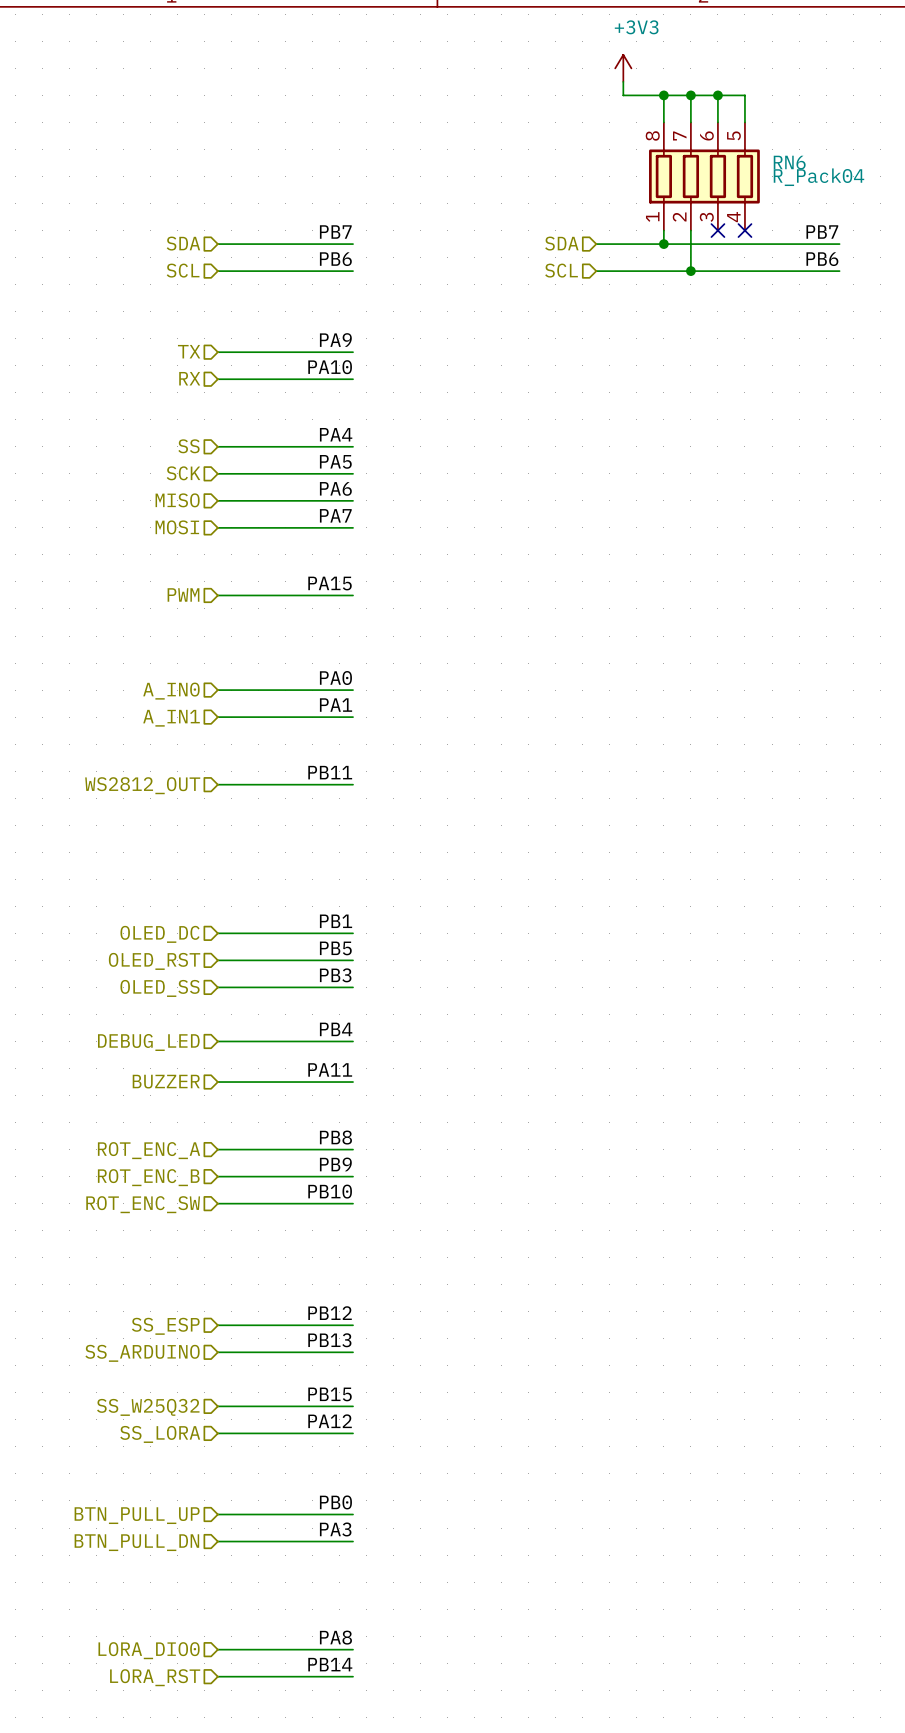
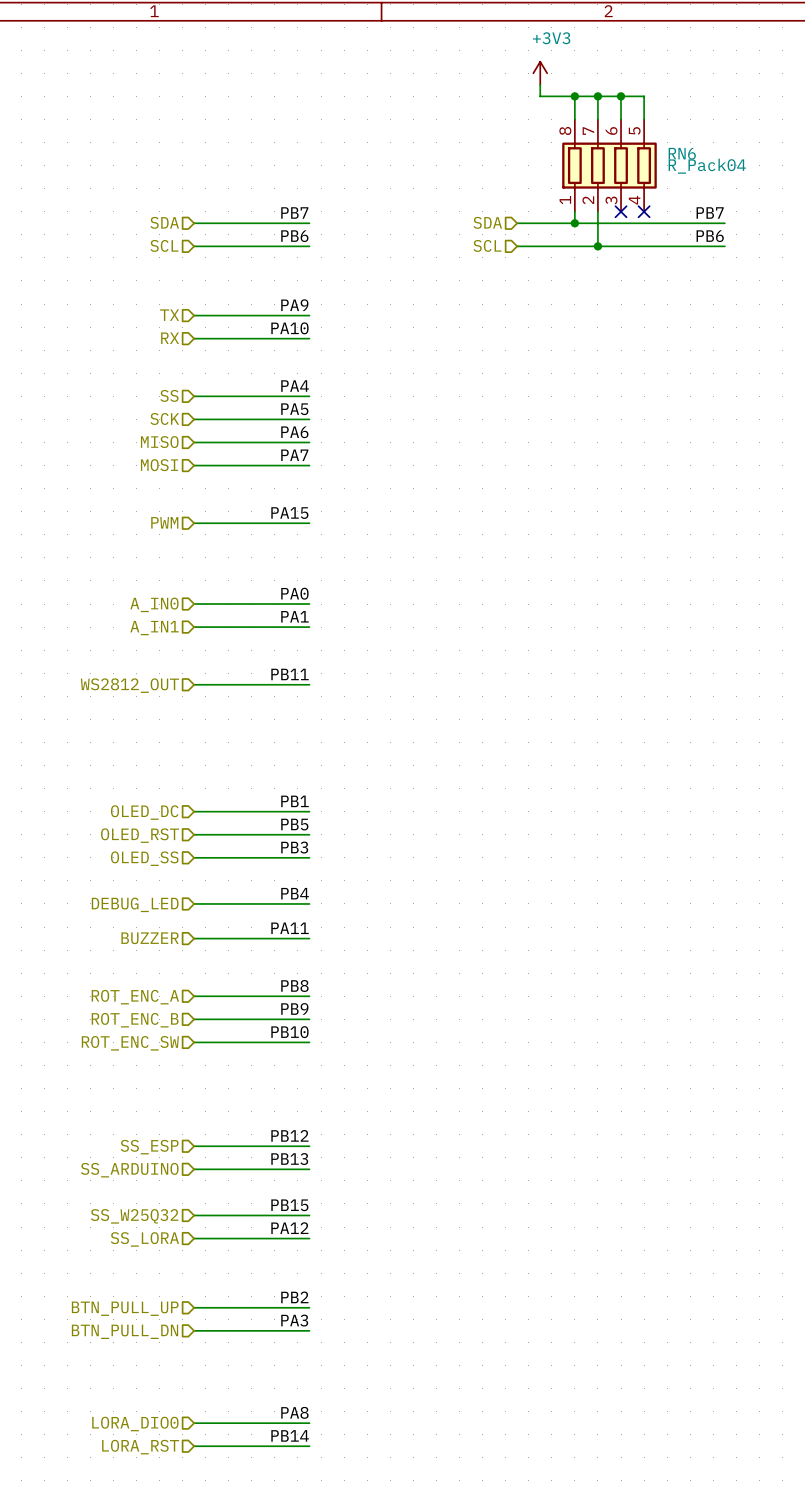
label: PB0 (335, 1502) -> PB2 (294, 1297)

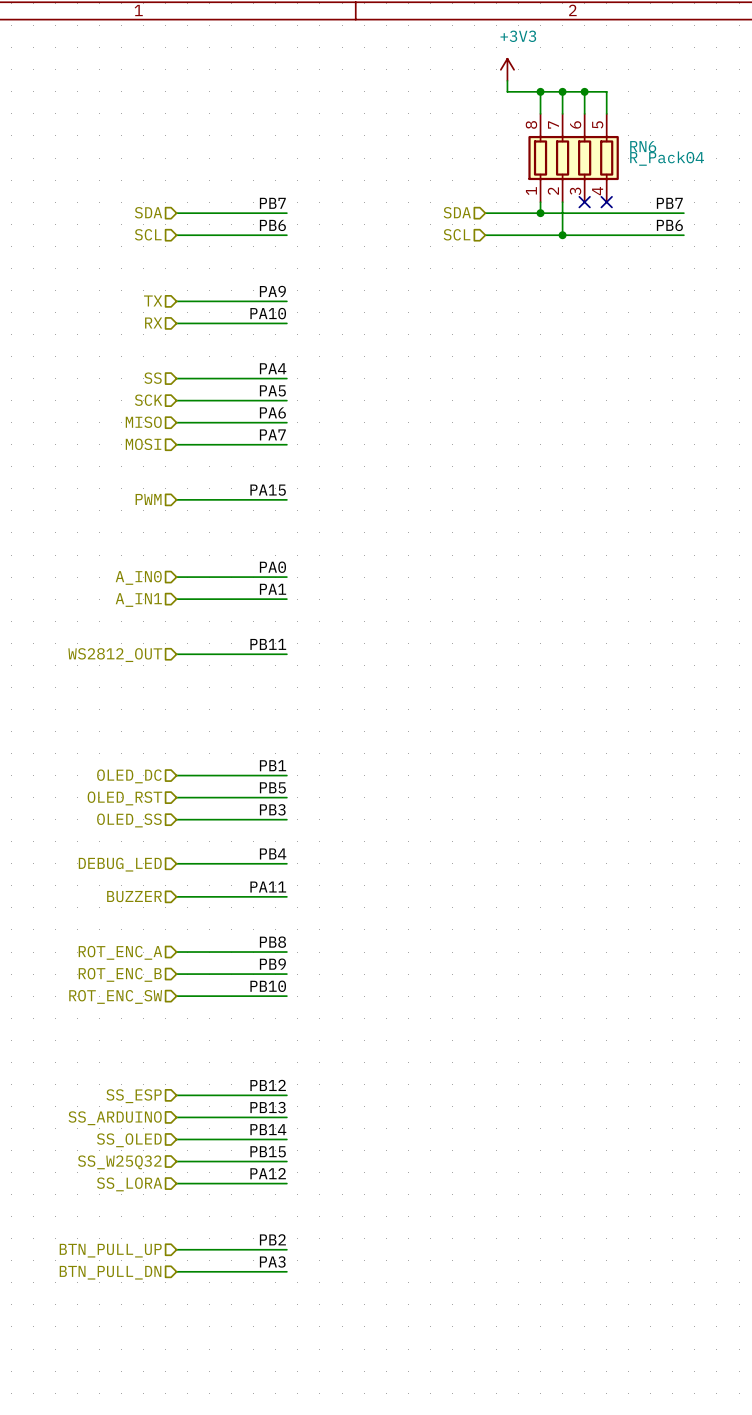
label: none -> PB14 (268, 1129)
wire: none -> (176, 1139) (286, 1139)
hierarchical label: none -> SS_OLED (129, 1140)
label: PA8 (294, 1412) -> none
wire: (194, 1423) (309, 1423) -> none
hierarchical label: LORA_DIO0 (135, 1424) -> none
label: PB14 (290, 1435) -> none
wire: (194, 1446) (309, 1446) -> none
hierarchical label: LORA_RST (140, 1447) -> none

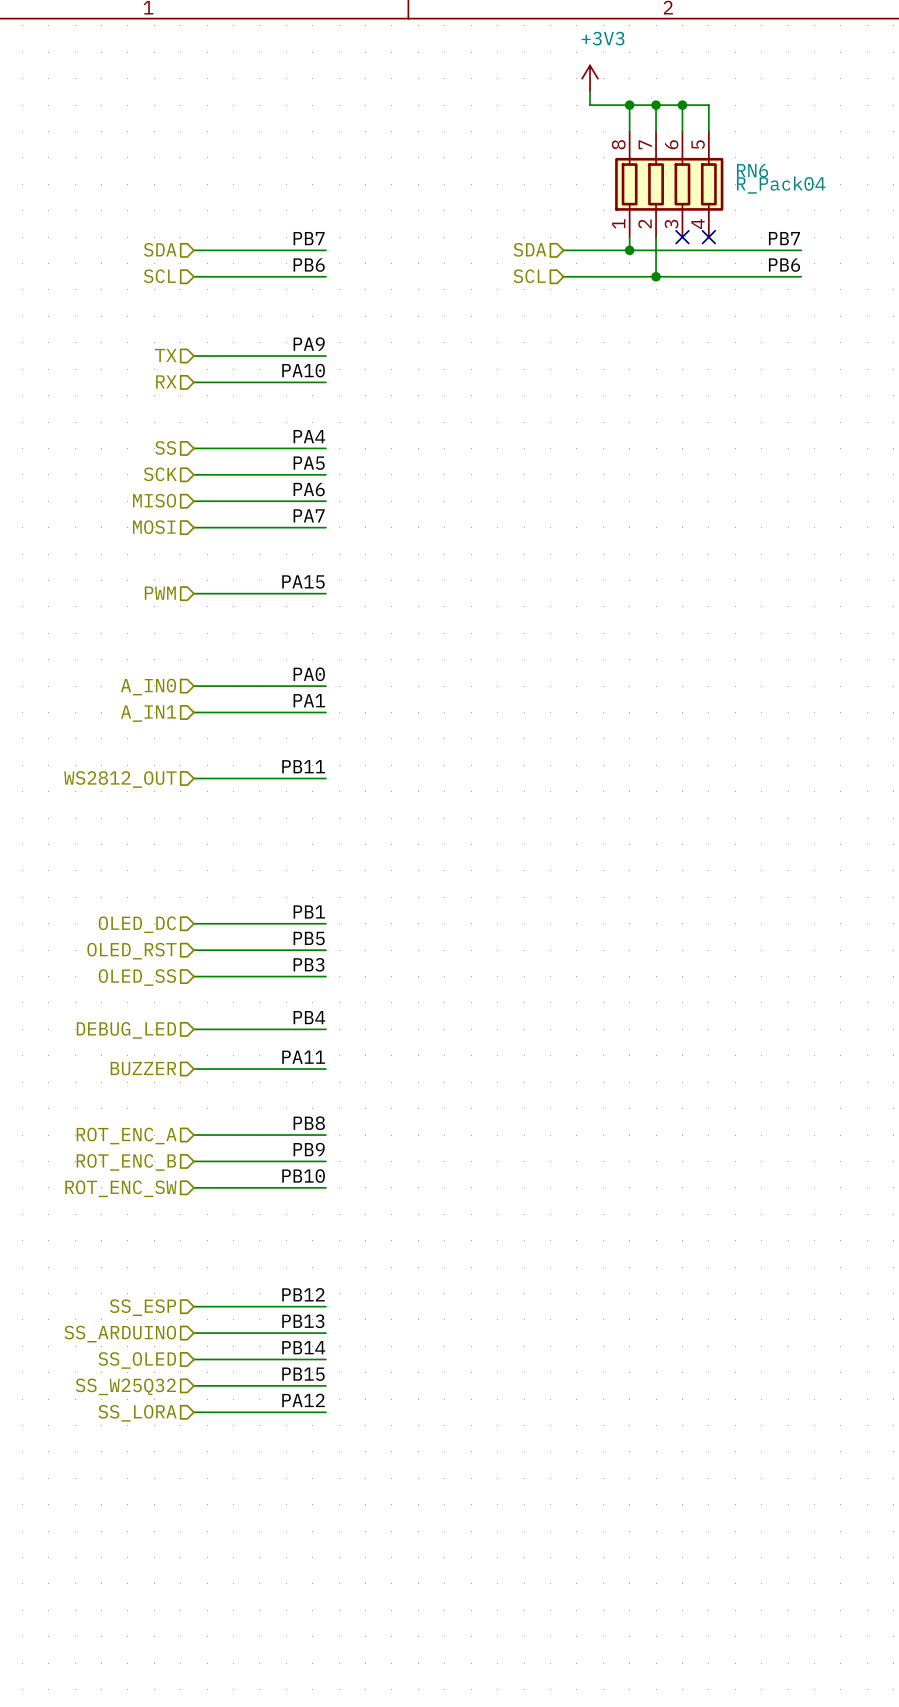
label: PB2 (272, 1239) -> none
wire: (176, 1249) (286, 1249) -> none
hierarchical label: BTN_PULL_UP (110, 1250) -> none
label: PA3 (272, 1261) -> none
wire: (176, 1271) (286, 1271) -> none
hierarchical label: BTN_PULL_DN (110, 1272) -> none

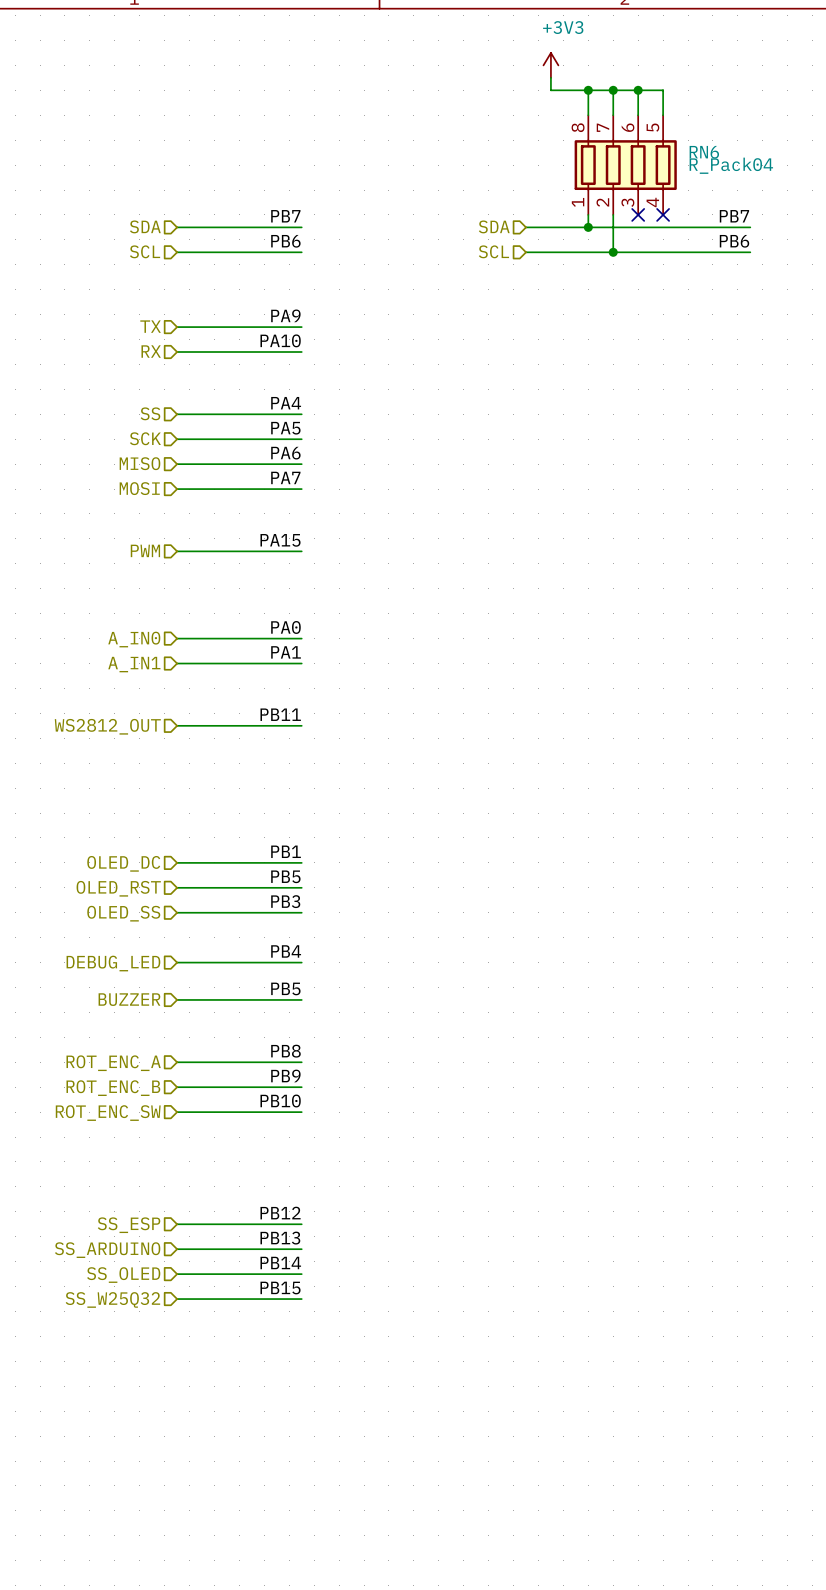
label: PA11 (303, 1057) -> PB5 (285, 988)
label: PA12 (303, 1400) -> none
wire: (193, 1412) (325, 1412) -> none
hierarchical label: SS_LORA (137, 1413) -> none

